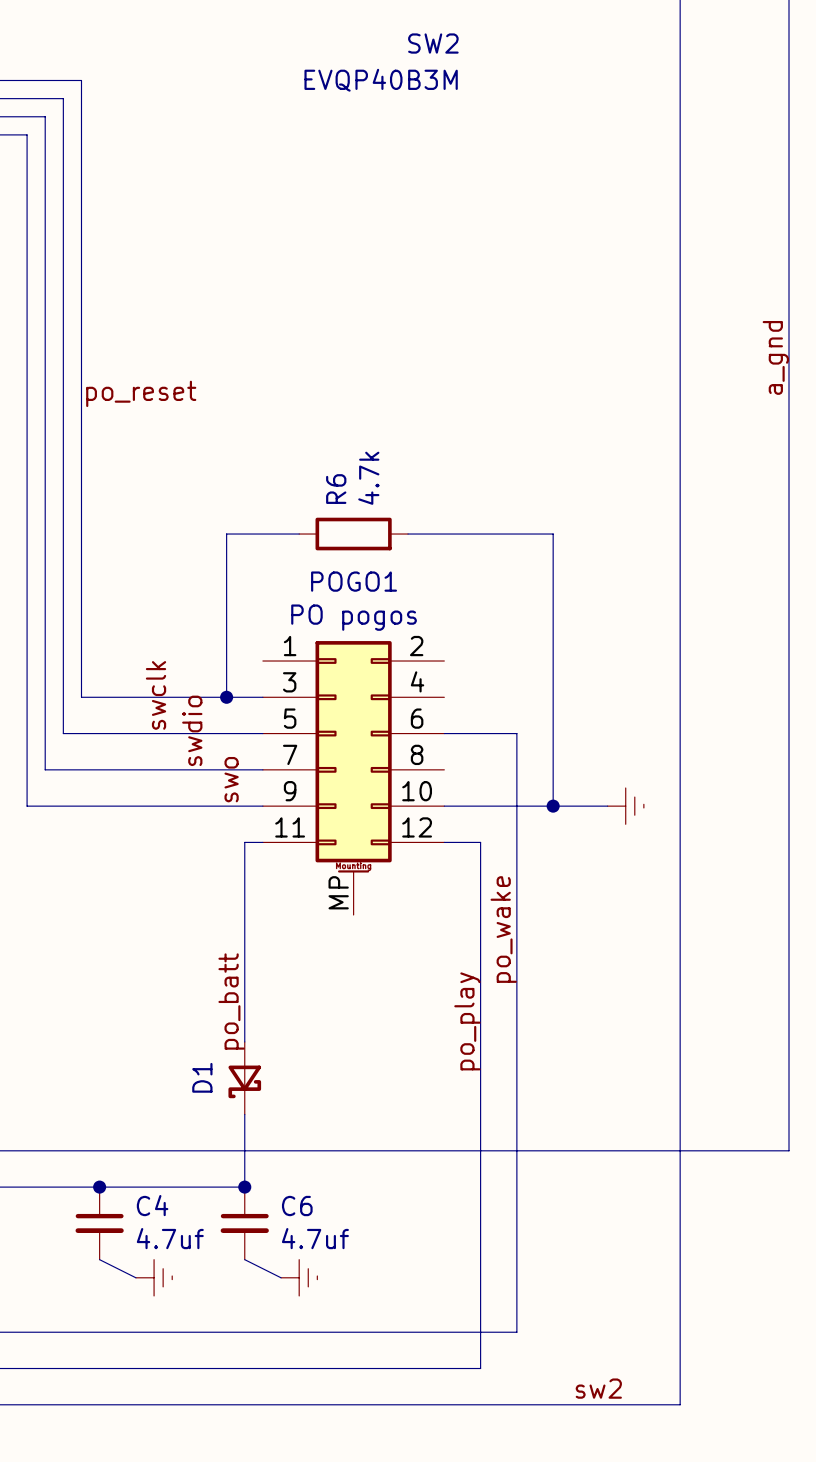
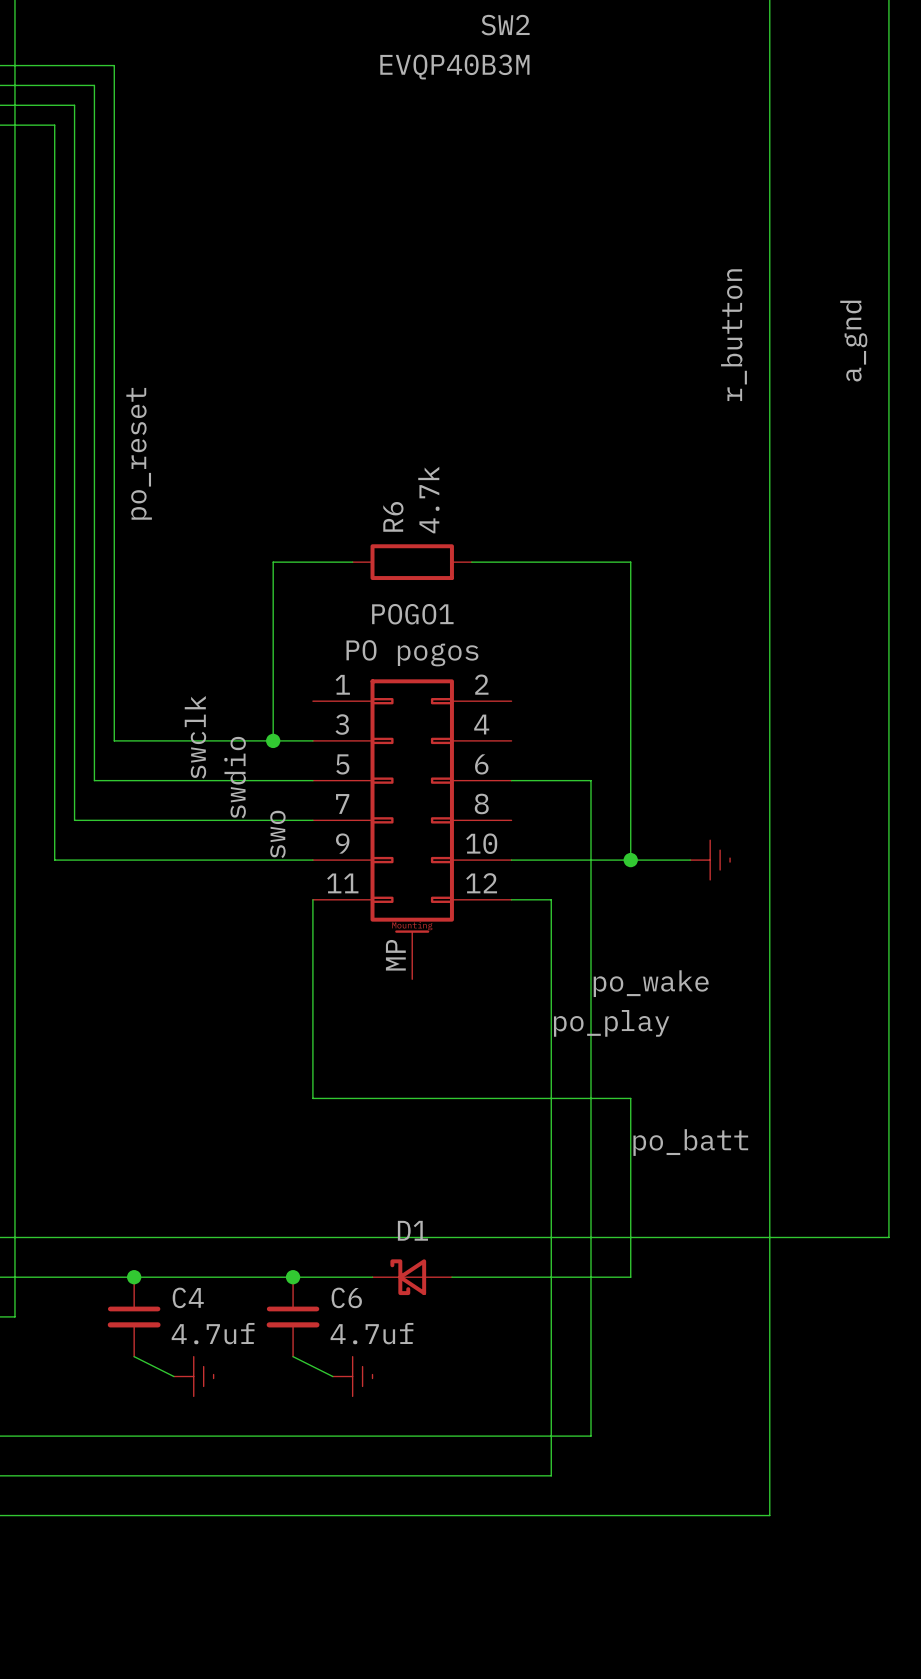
label: none -> r_button (733, 335)
label position: a_gnd (775, 357) -> a_gnd (853, 341)
label rotation: 0° (141, 393) -> 90° counterclockwise (139, 453)
wire: (262, 842) (244, 842) (244, 1041) -> (312, 899) (312, 1098) (630, 1098) (630, 1277) (451, 1277)
label rotation: 0° (503, 929) -> 90° clockwise (651, 983)
label rotation: 0° (231, 1001) -> 90° clockwise (690, 1142)
label position: po_batt (231, 1001) -> po_batt (690, 1142)
label rotation: 0° (467, 1021) -> 90° clockwise (611, 1023)
D1 position: (244, 1078) -> (412, 1277)
D1 rotation: 0° (244, 1081) -> 90° clockwise (408, 1277)
wire: (244, 1114) (244, 1187) -> (372, 1277) (293, 1277)
label: sw2 (598, 1388) -> none

